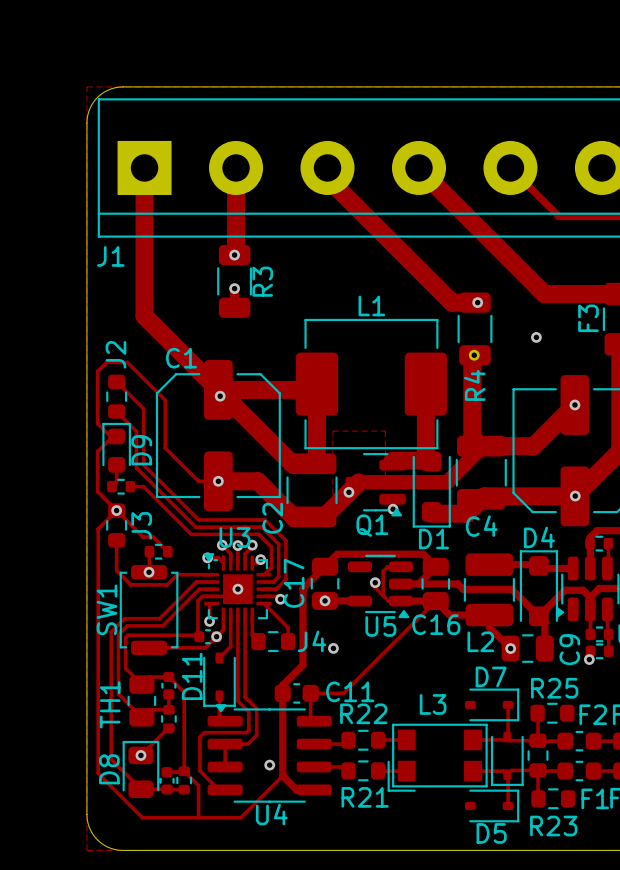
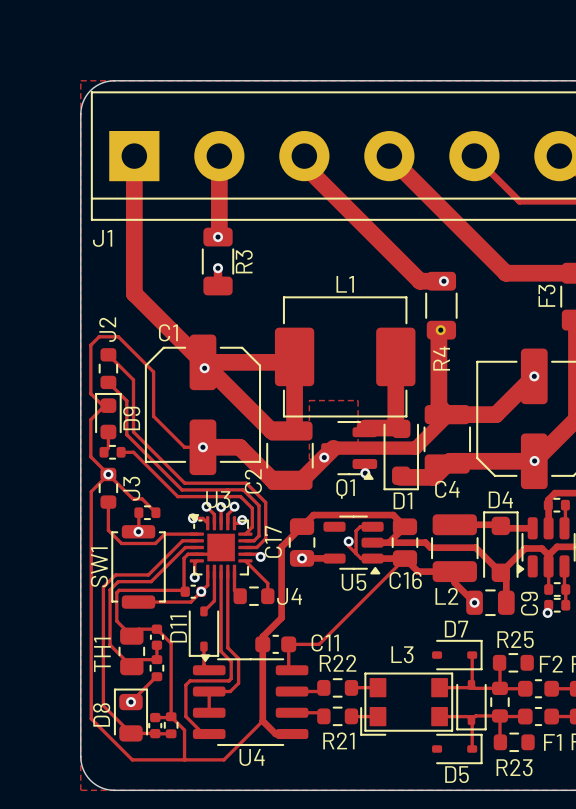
via: (536, 337) -> none
via: (237, 589) -> none
via: (333, 648) -> none
via: (269, 765) -> none

